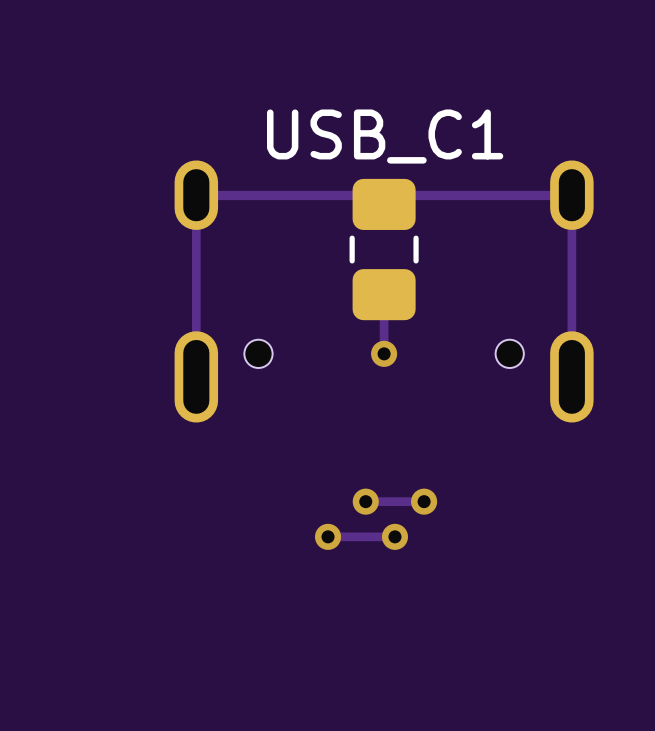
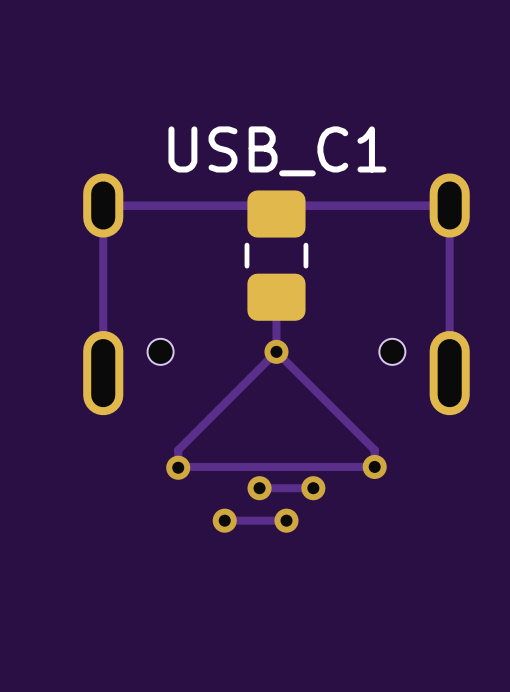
track: none -> (276, 351) (374, 450) (374, 466) (178, 467) (178, 450) (276, 351)
via: none -> (374, 466)
via: none -> (178, 467)

